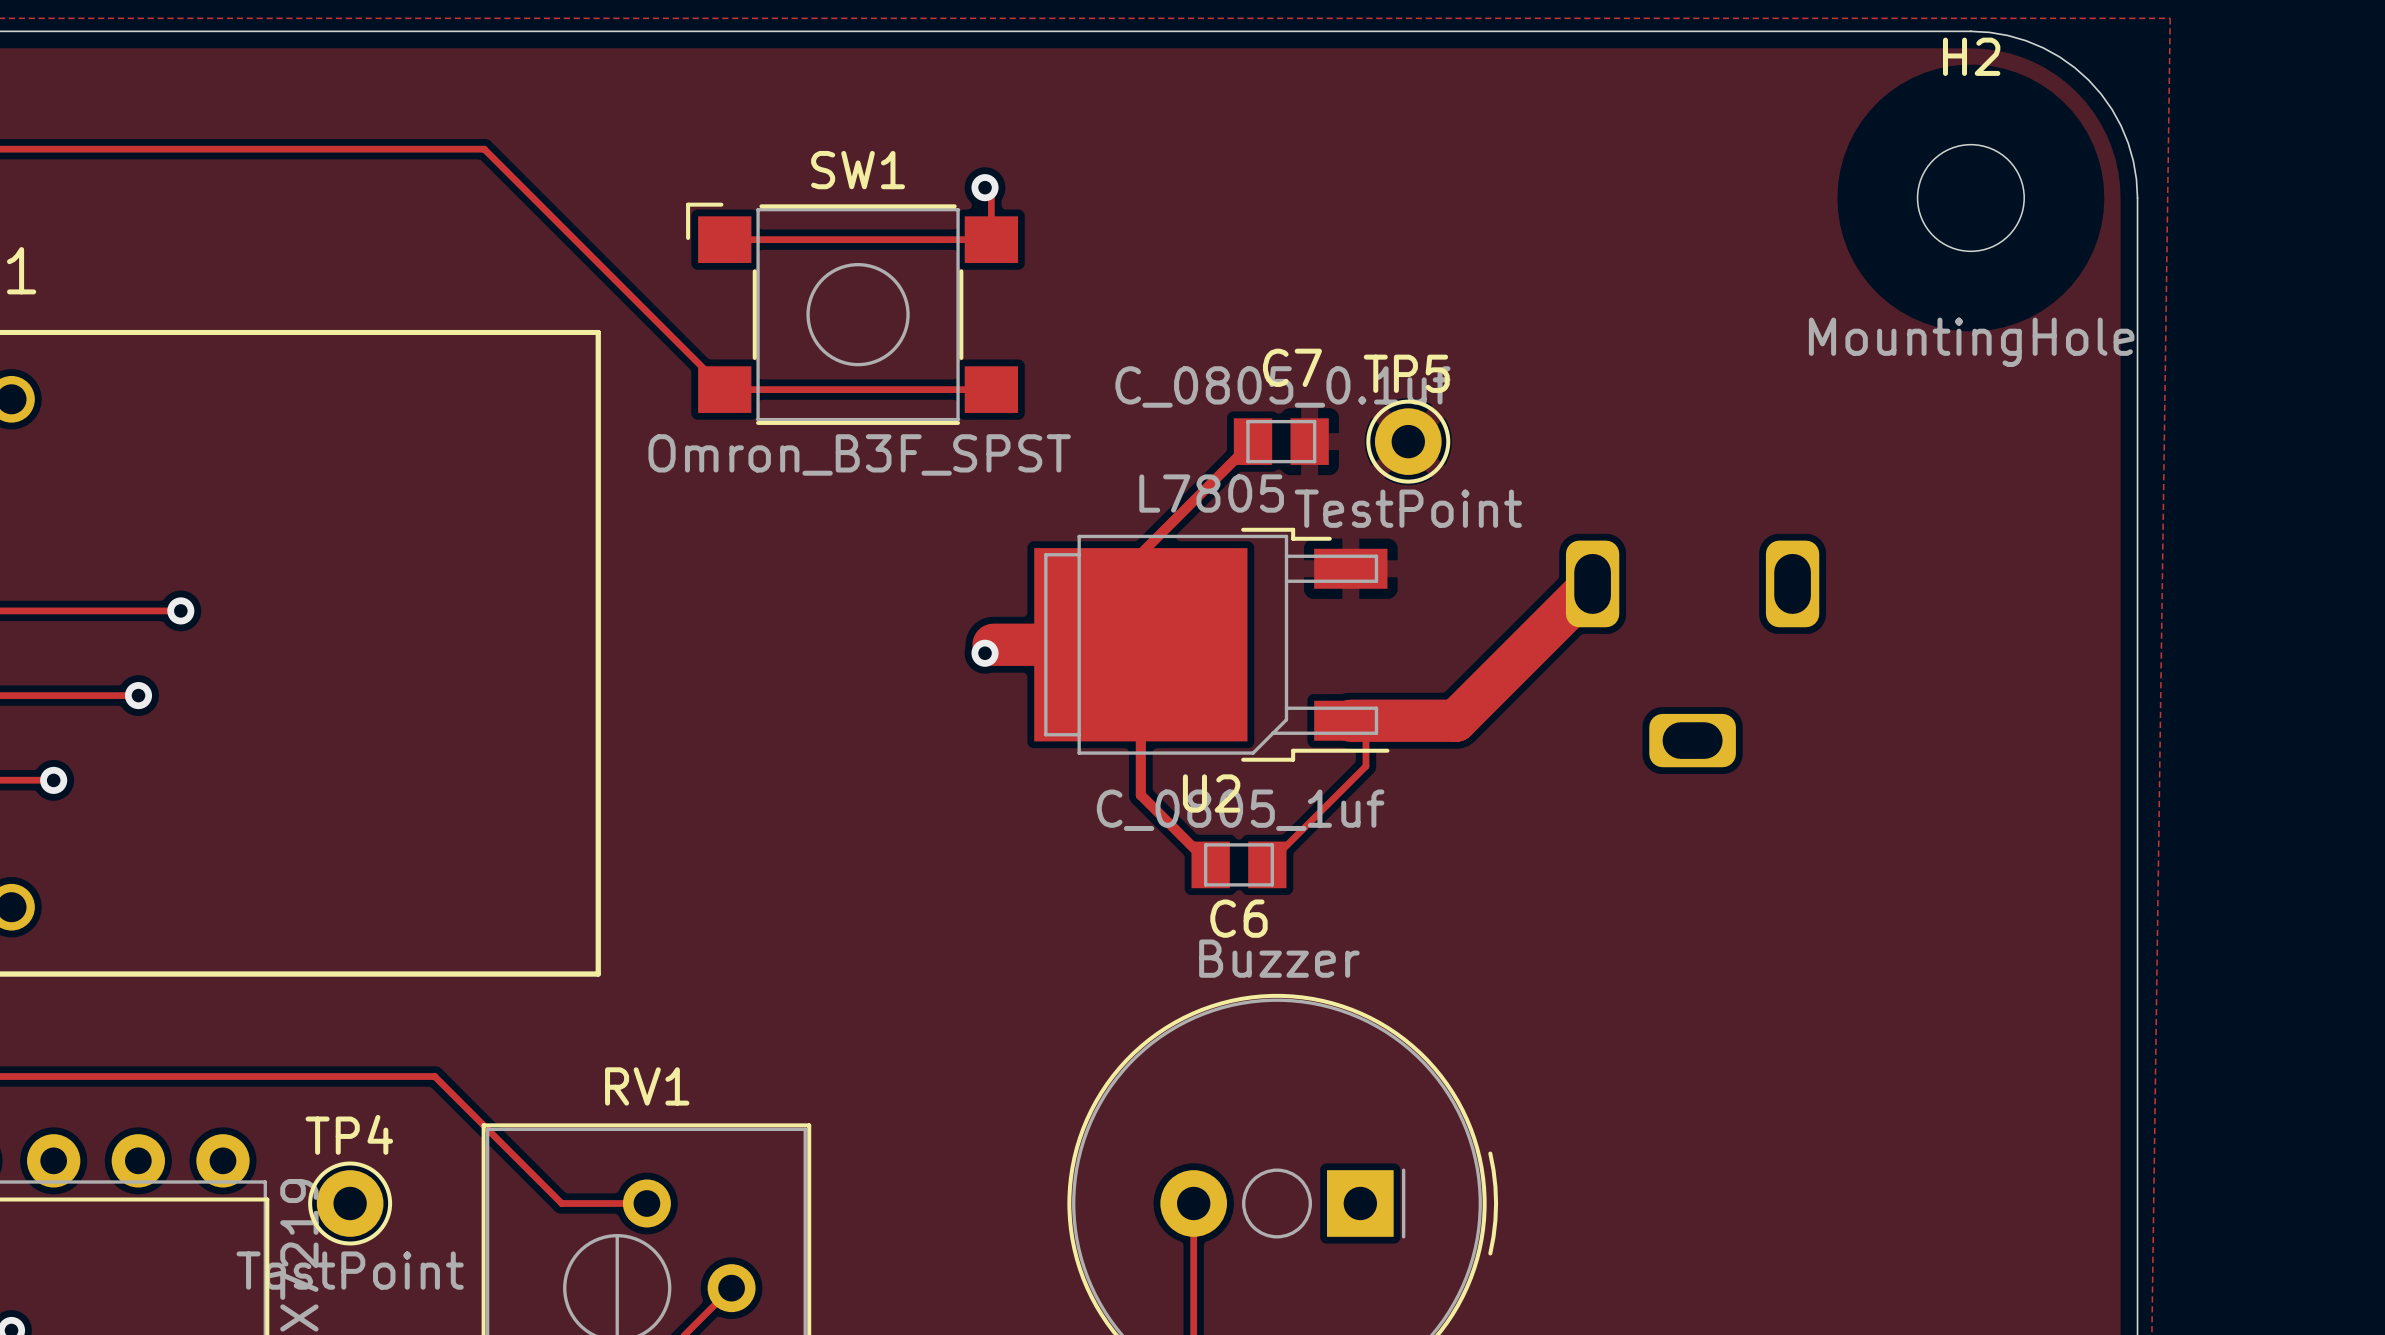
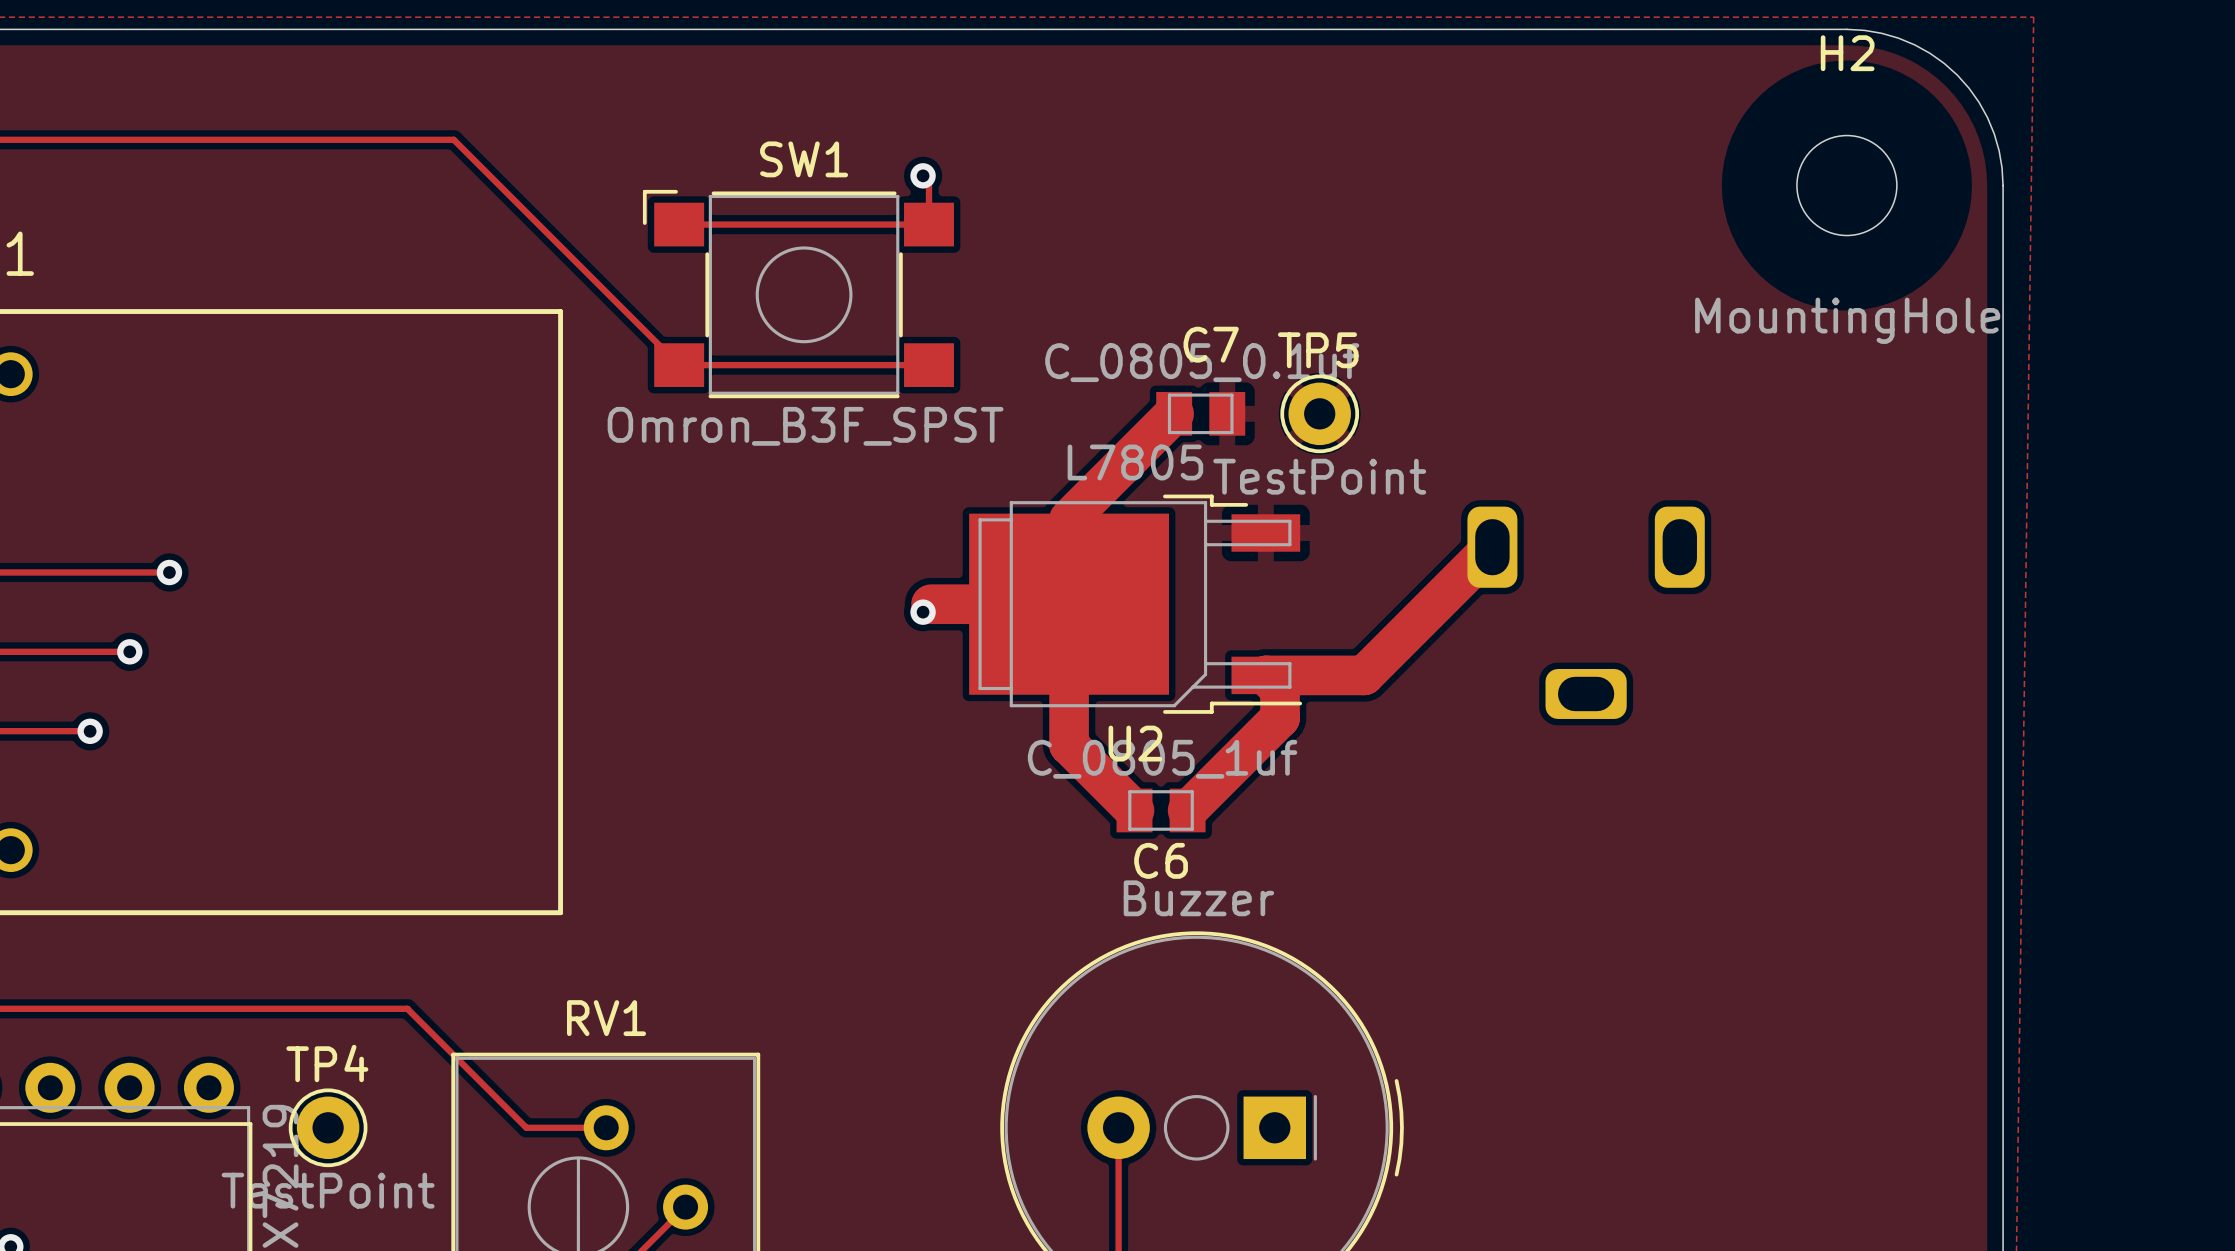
track width: thin (1252, 441) (1140, 553) -> thick (1174, 413) (1069, 518)
track width: thin (1140, 644) (1140, 795) (1210, 864) -> thick (1069, 604) (1069, 745) (1134, 810)
track width: thin (1350, 720) (1365, 735) (1365, 766) (1267, 864) -> thick (1265, 675) (1280, 689) (1280, 718) (1187, 810)
track: none -> (50, 731) (89, 731)
via position: (53, 780) -> (90, 731)

